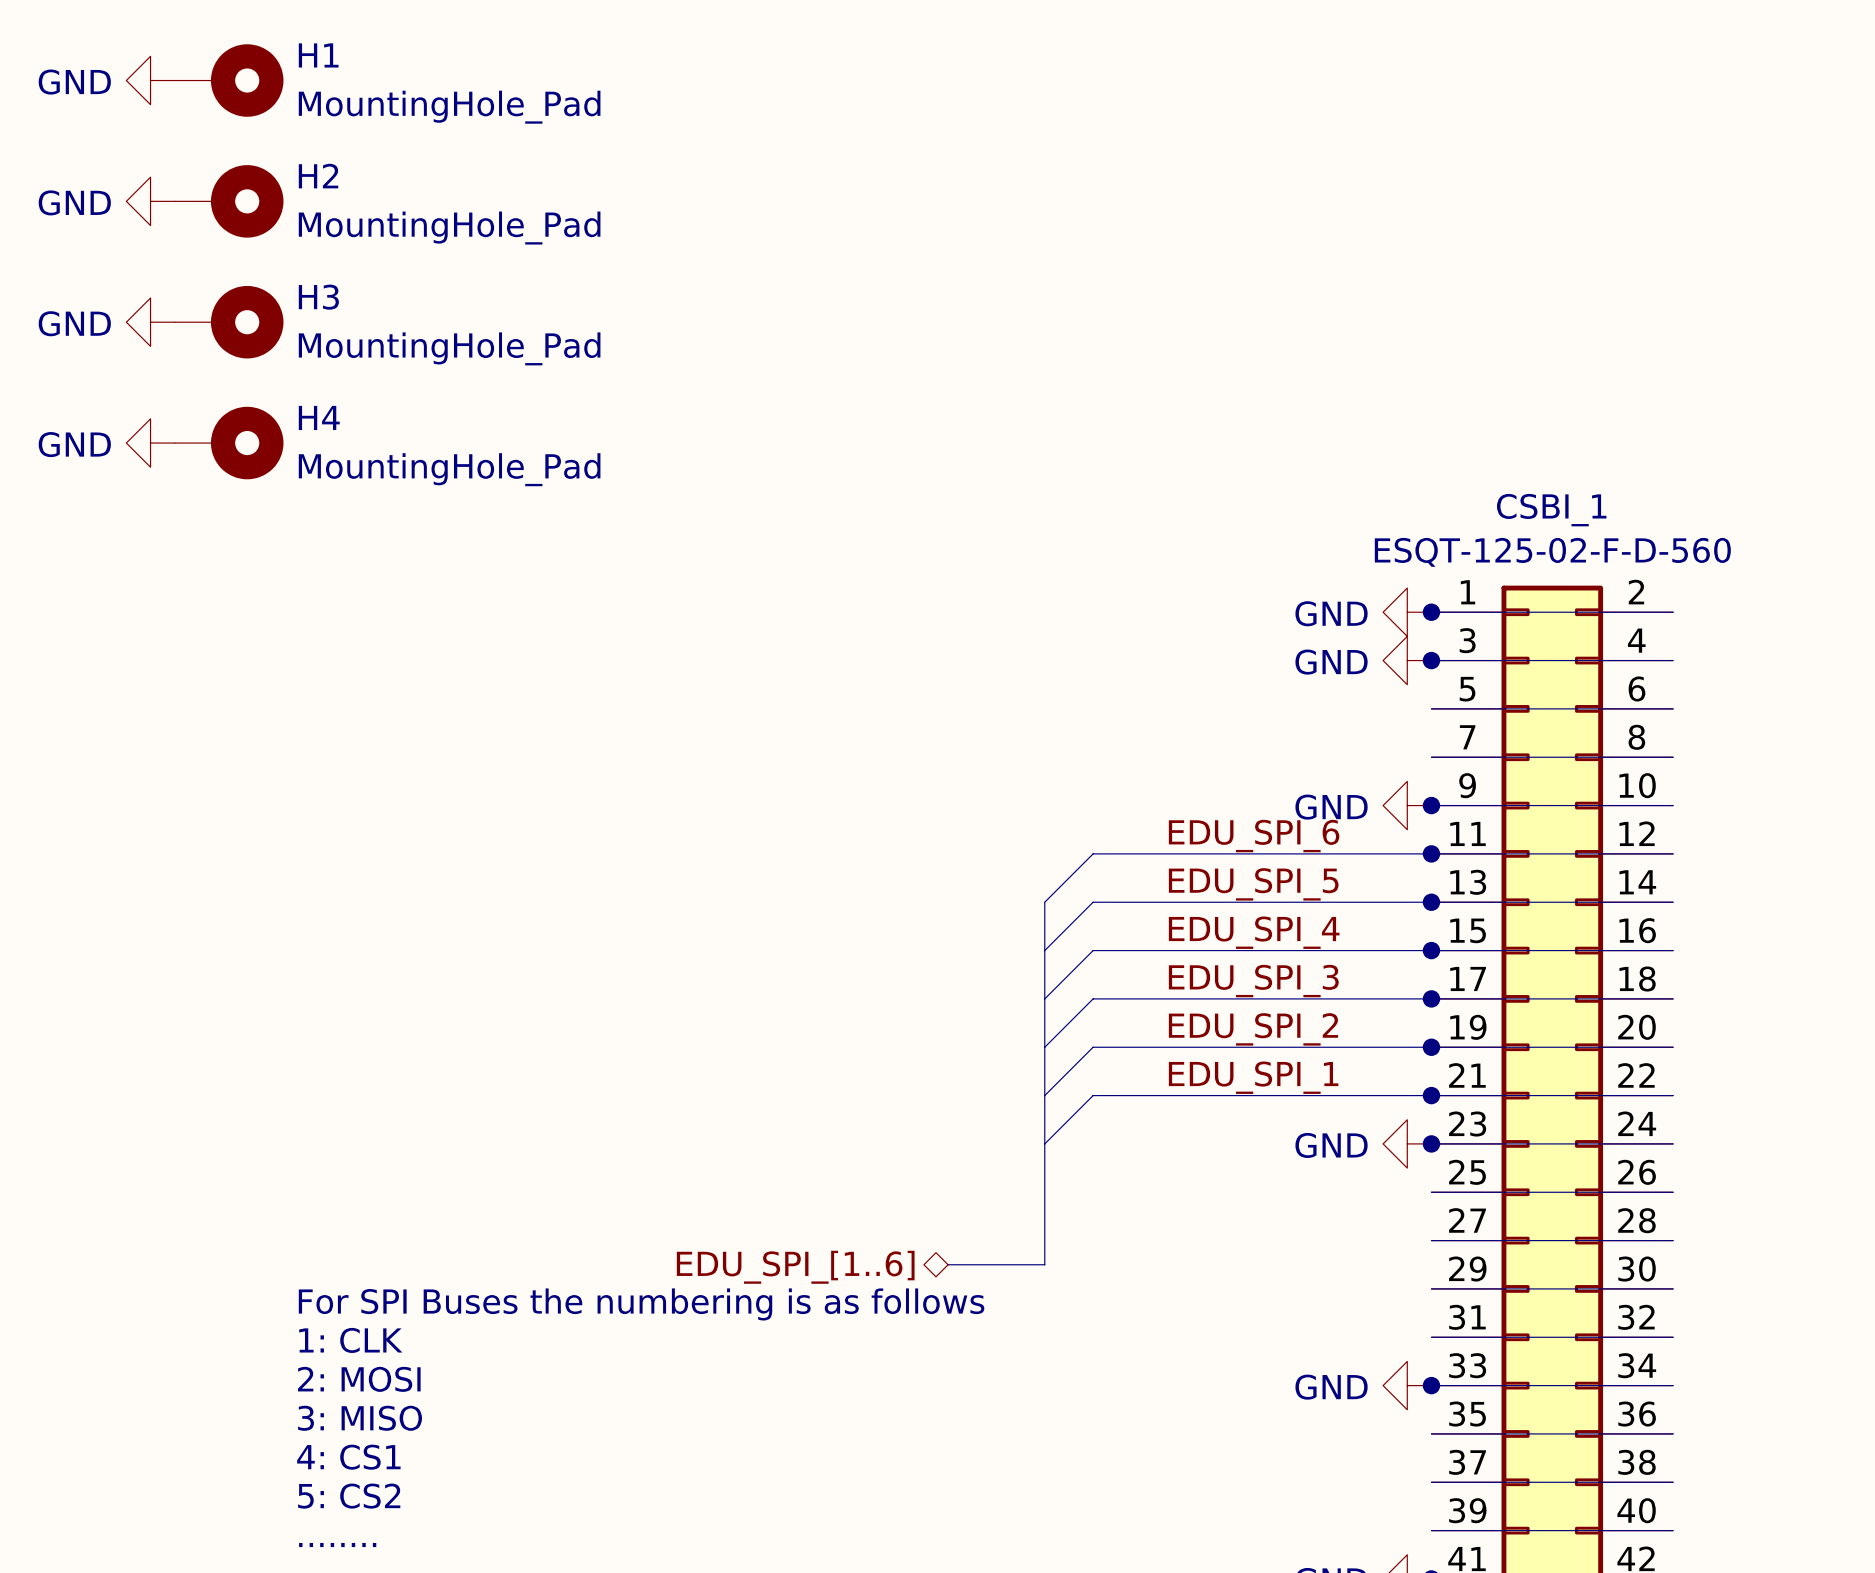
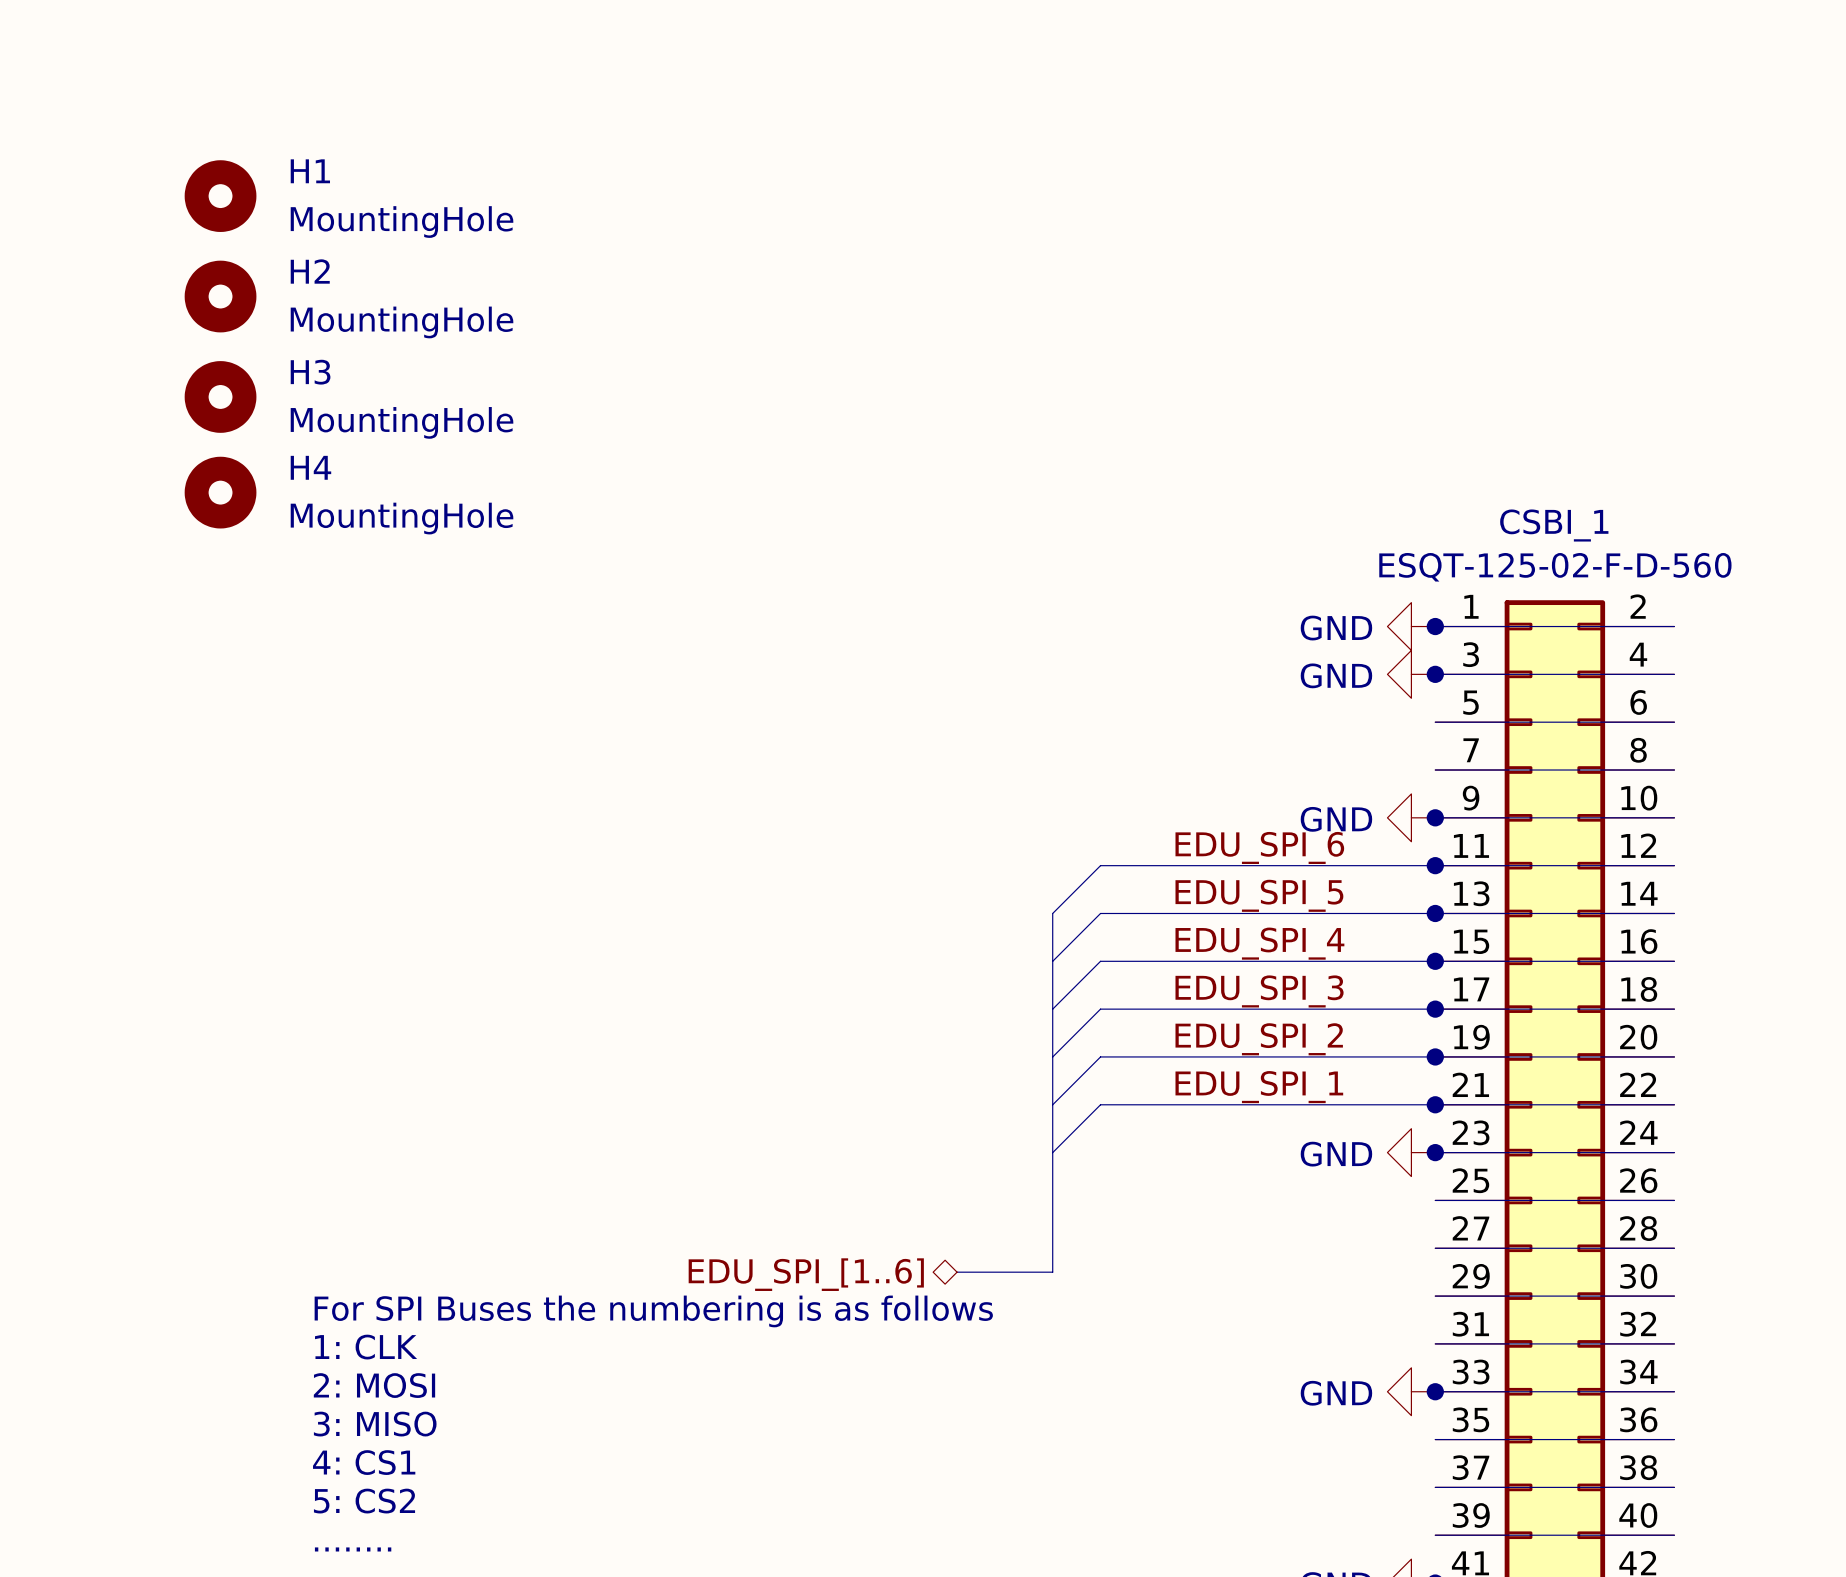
H1 symbol: [174, 44, 284, 117] -> [184, 160, 257, 232]
power symbol: GND (150, 80) -> none
H1 value: MountingHole_Pad (449, 107) -> MountingHole (402, 222)
H2 symbol: [174, 165, 284, 238] -> [184, 260, 257, 333]
power symbol: GND (150, 201) -> none
H2 value: MountingHole_Pad (449, 228) -> MountingHole (402, 322)
H3 symbol: [174, 285, 284, 359] -> [184, 361, 257, 433]
power symbol: GND (150, 322) -> none
H3 value: MountingHole_Pad (449, 348) -> MountingHole (402, 422)
H4 symbol: [174, 406, 284, 480] -> [184, 456, 257, 529]
power symbol: GND (150, 443) -> none
H4 value: MountingHole_Pad (449, 469) -> MountingHole (402, 518)

